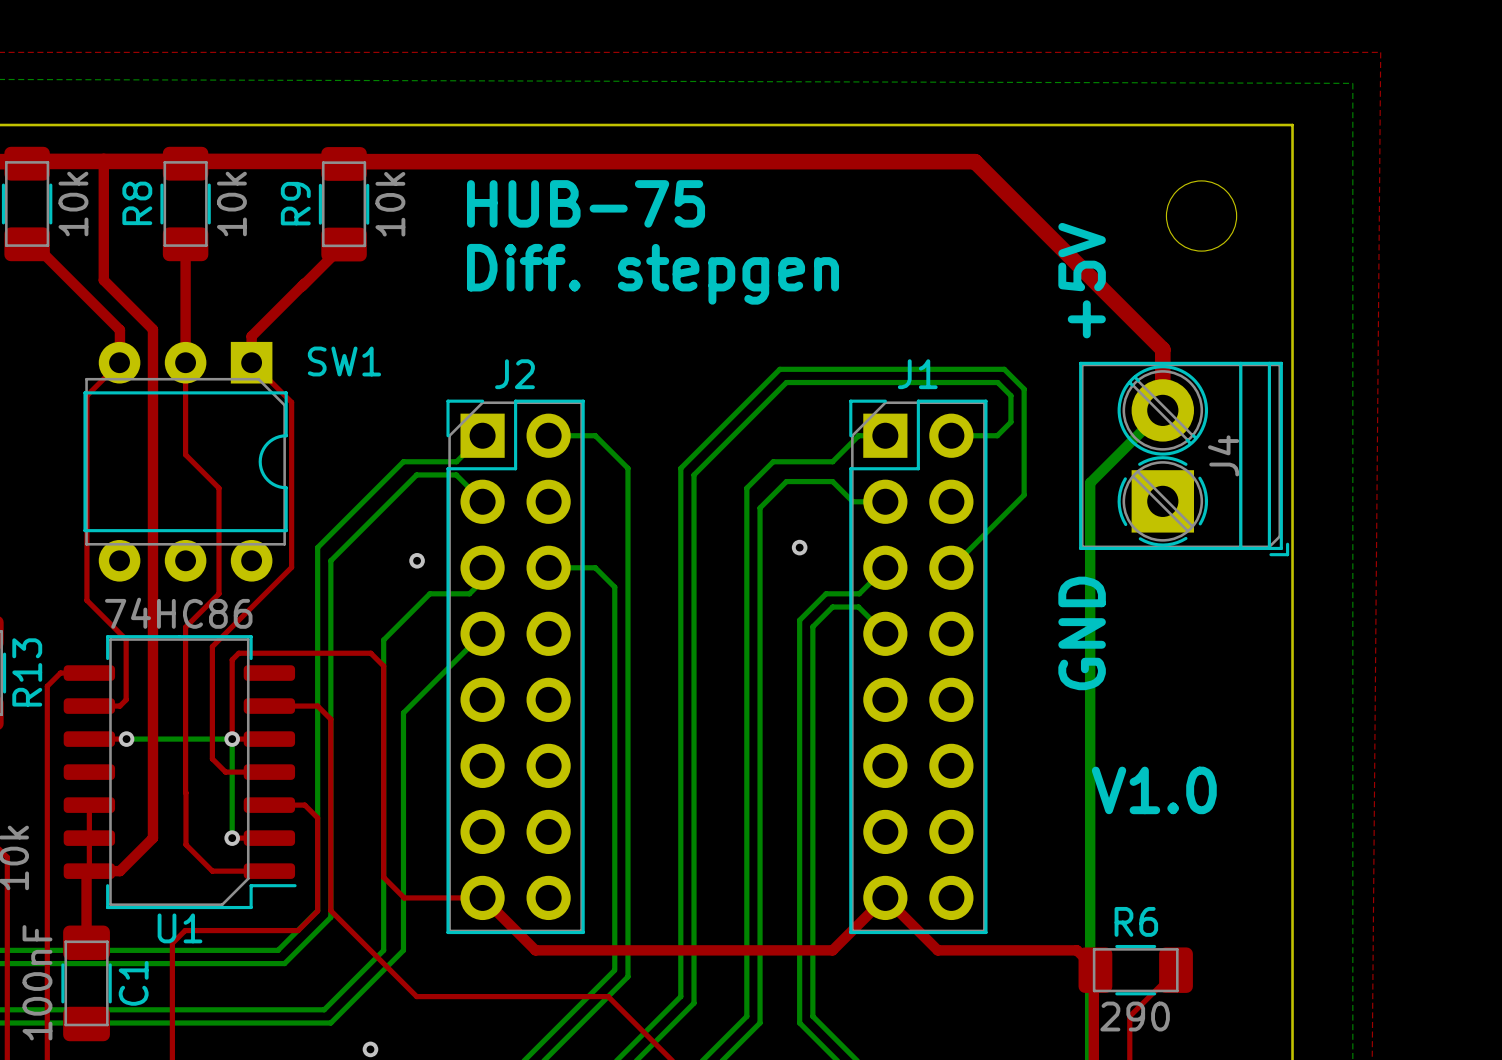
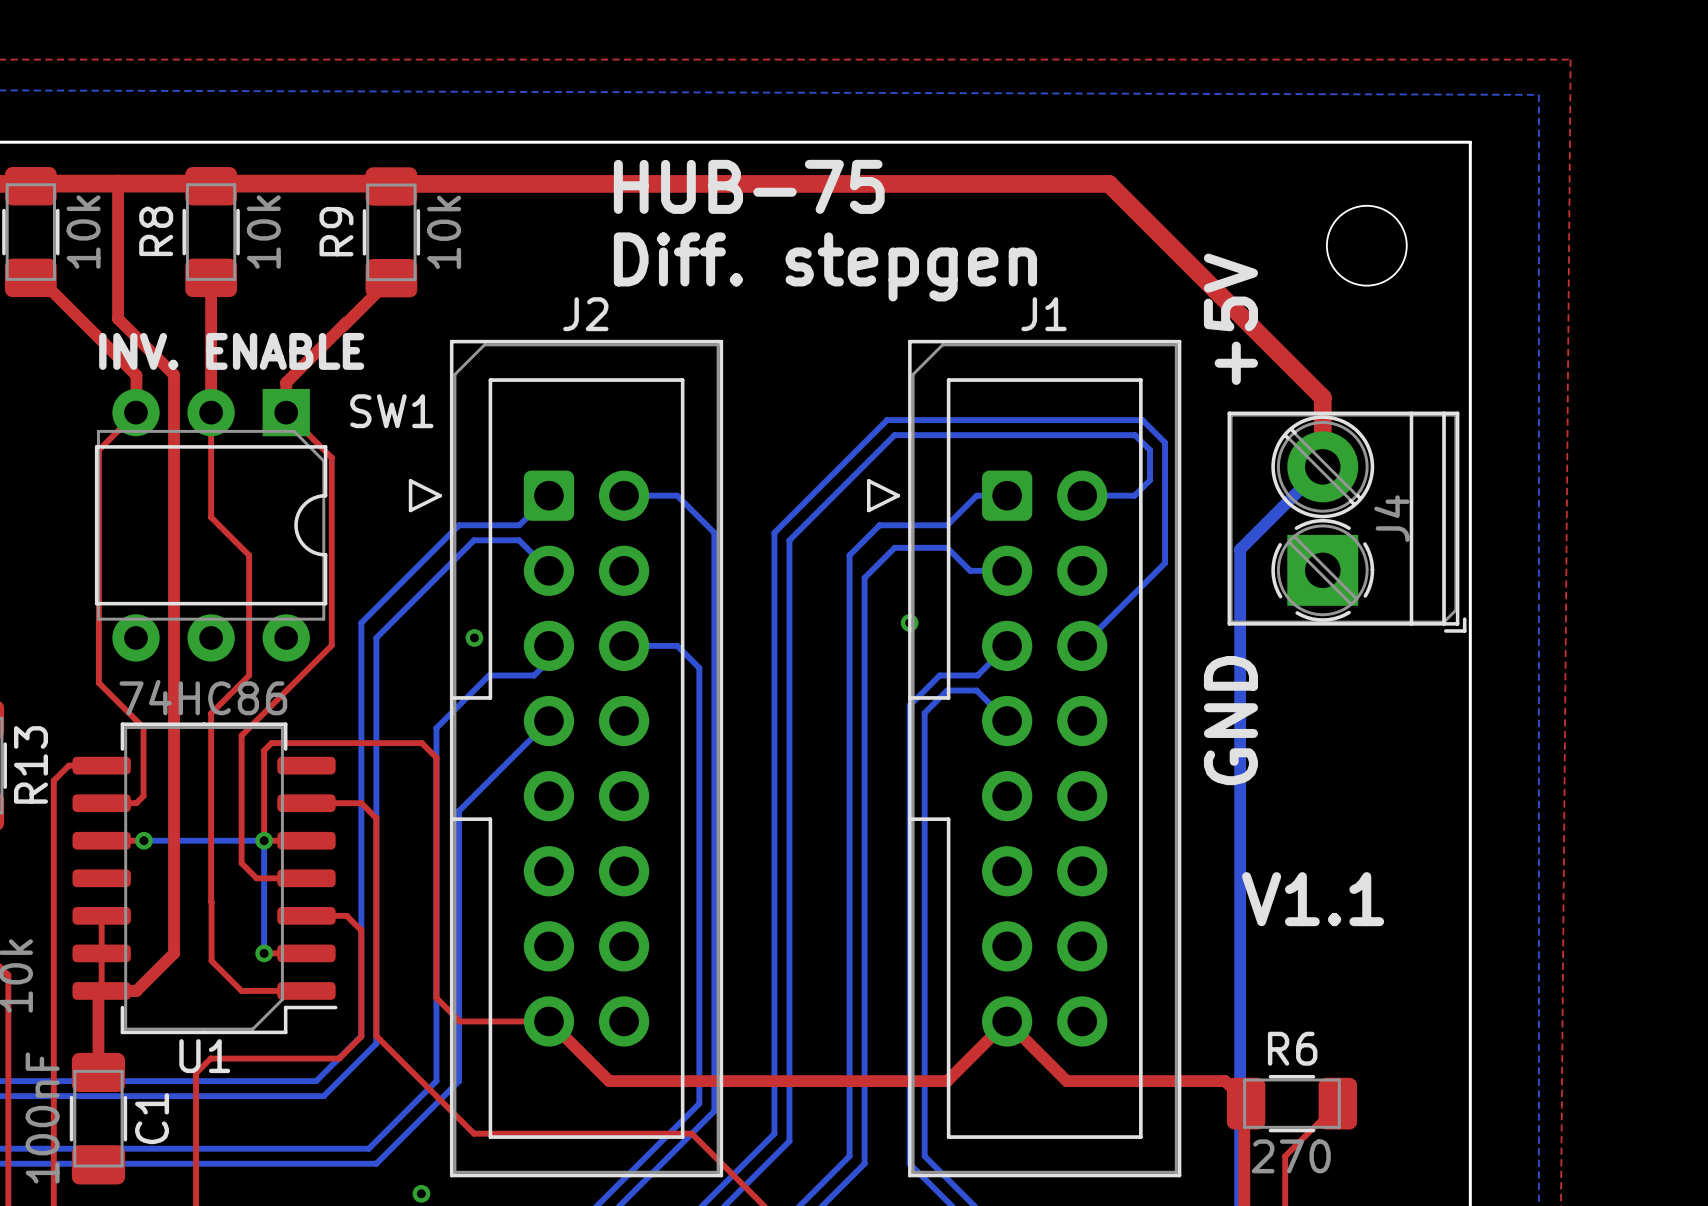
text position: HUB-75 (586, 203) -> HUB-75 (749, 186)
text position: Diff. stepgen (653, 274) -> Diff. stepgen (825, 266)
text: none -> INV. ENABLE (231, 351)
J2 name position: J2 (514, 374) -> J2 (585, 314)
J1 name position: J1 (917, 374) -> J1 (1044, 314)
J2 footprint: [446, 399, 585, 935] -> [408, 339, 724, 1178]
J1 footprint: [849, 399, 988, 935] -> [866, 339, 1182, 1178]
text: V1.0 (1154, 790) -> V1.1 (1313, 899)
R6 value: 290 (1135, 1016) -> 270 (1291, 1156)

